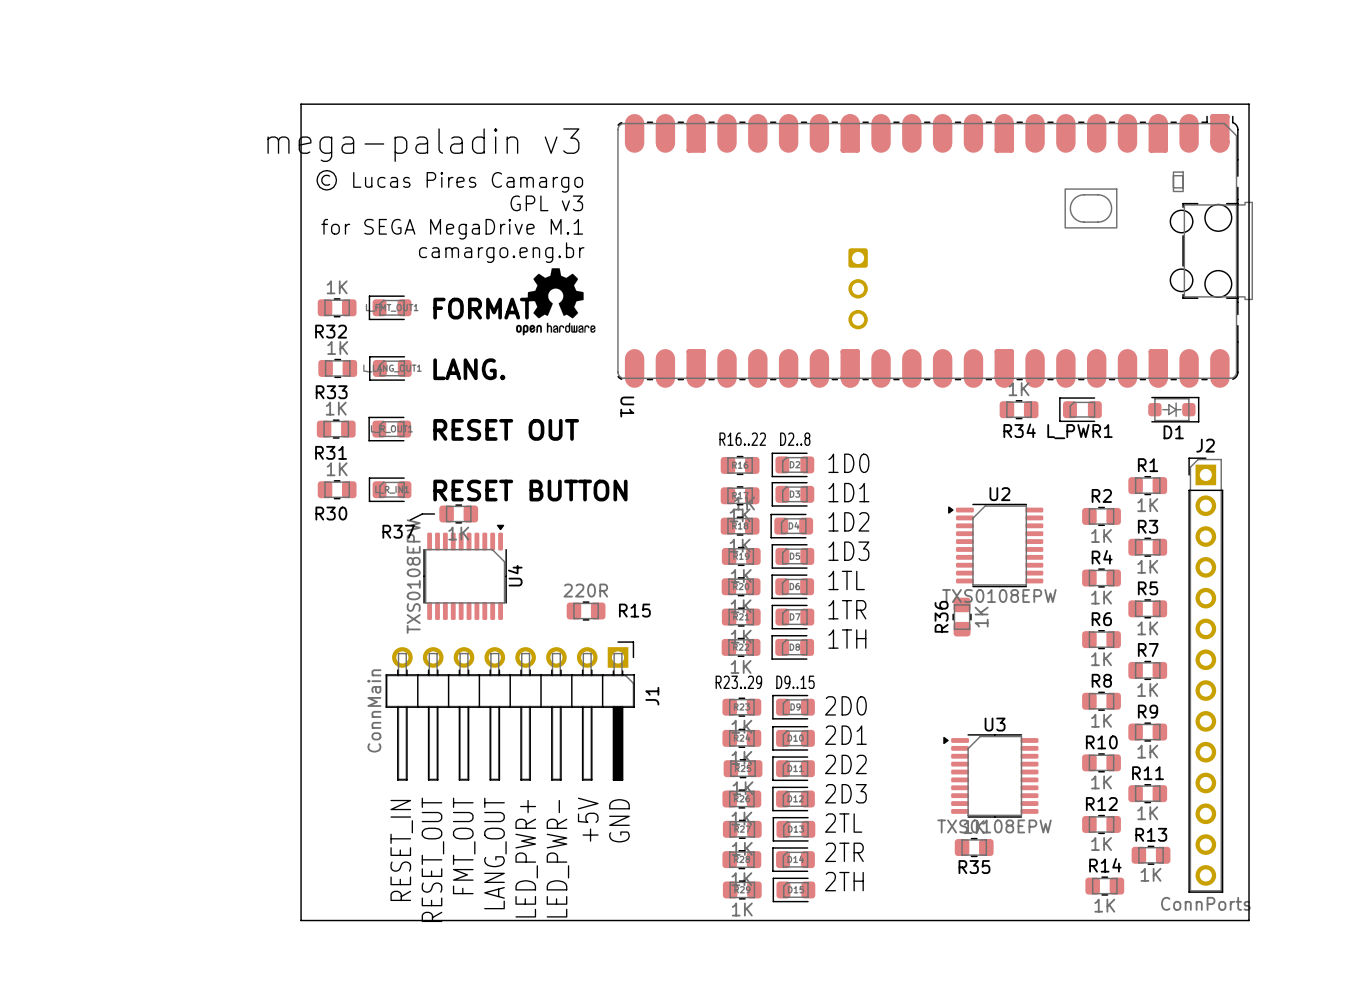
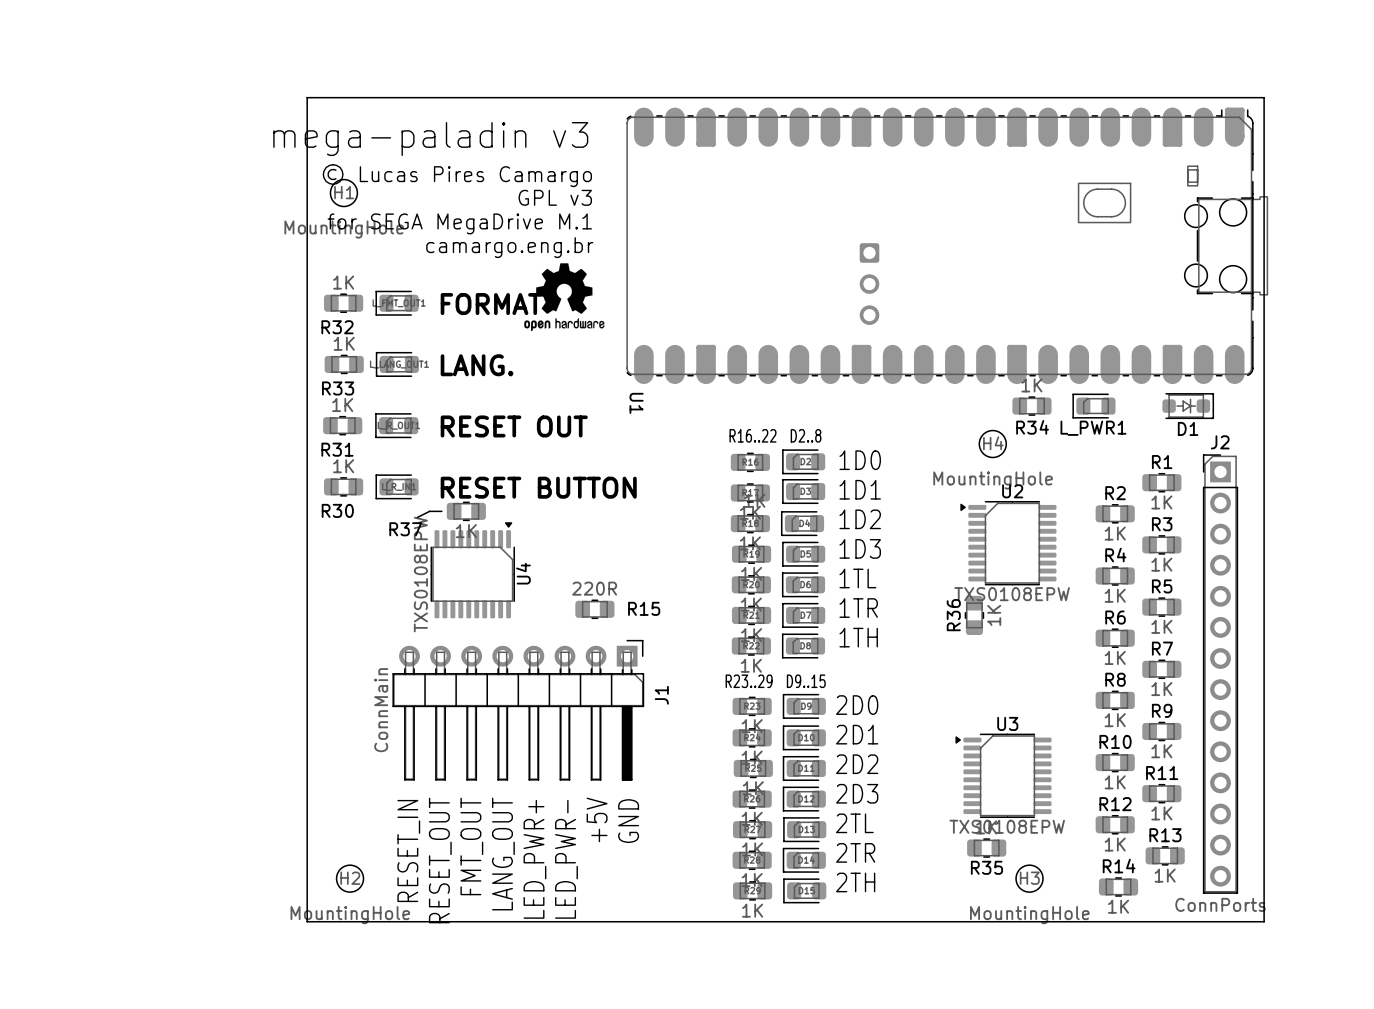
H1: none -> MountingHole (343, 193)
H4: none -> MountingHole (992, 444)
H2: none -> MountingHole (350, 878)
H3: none -> MountingHole (1029, 878)

